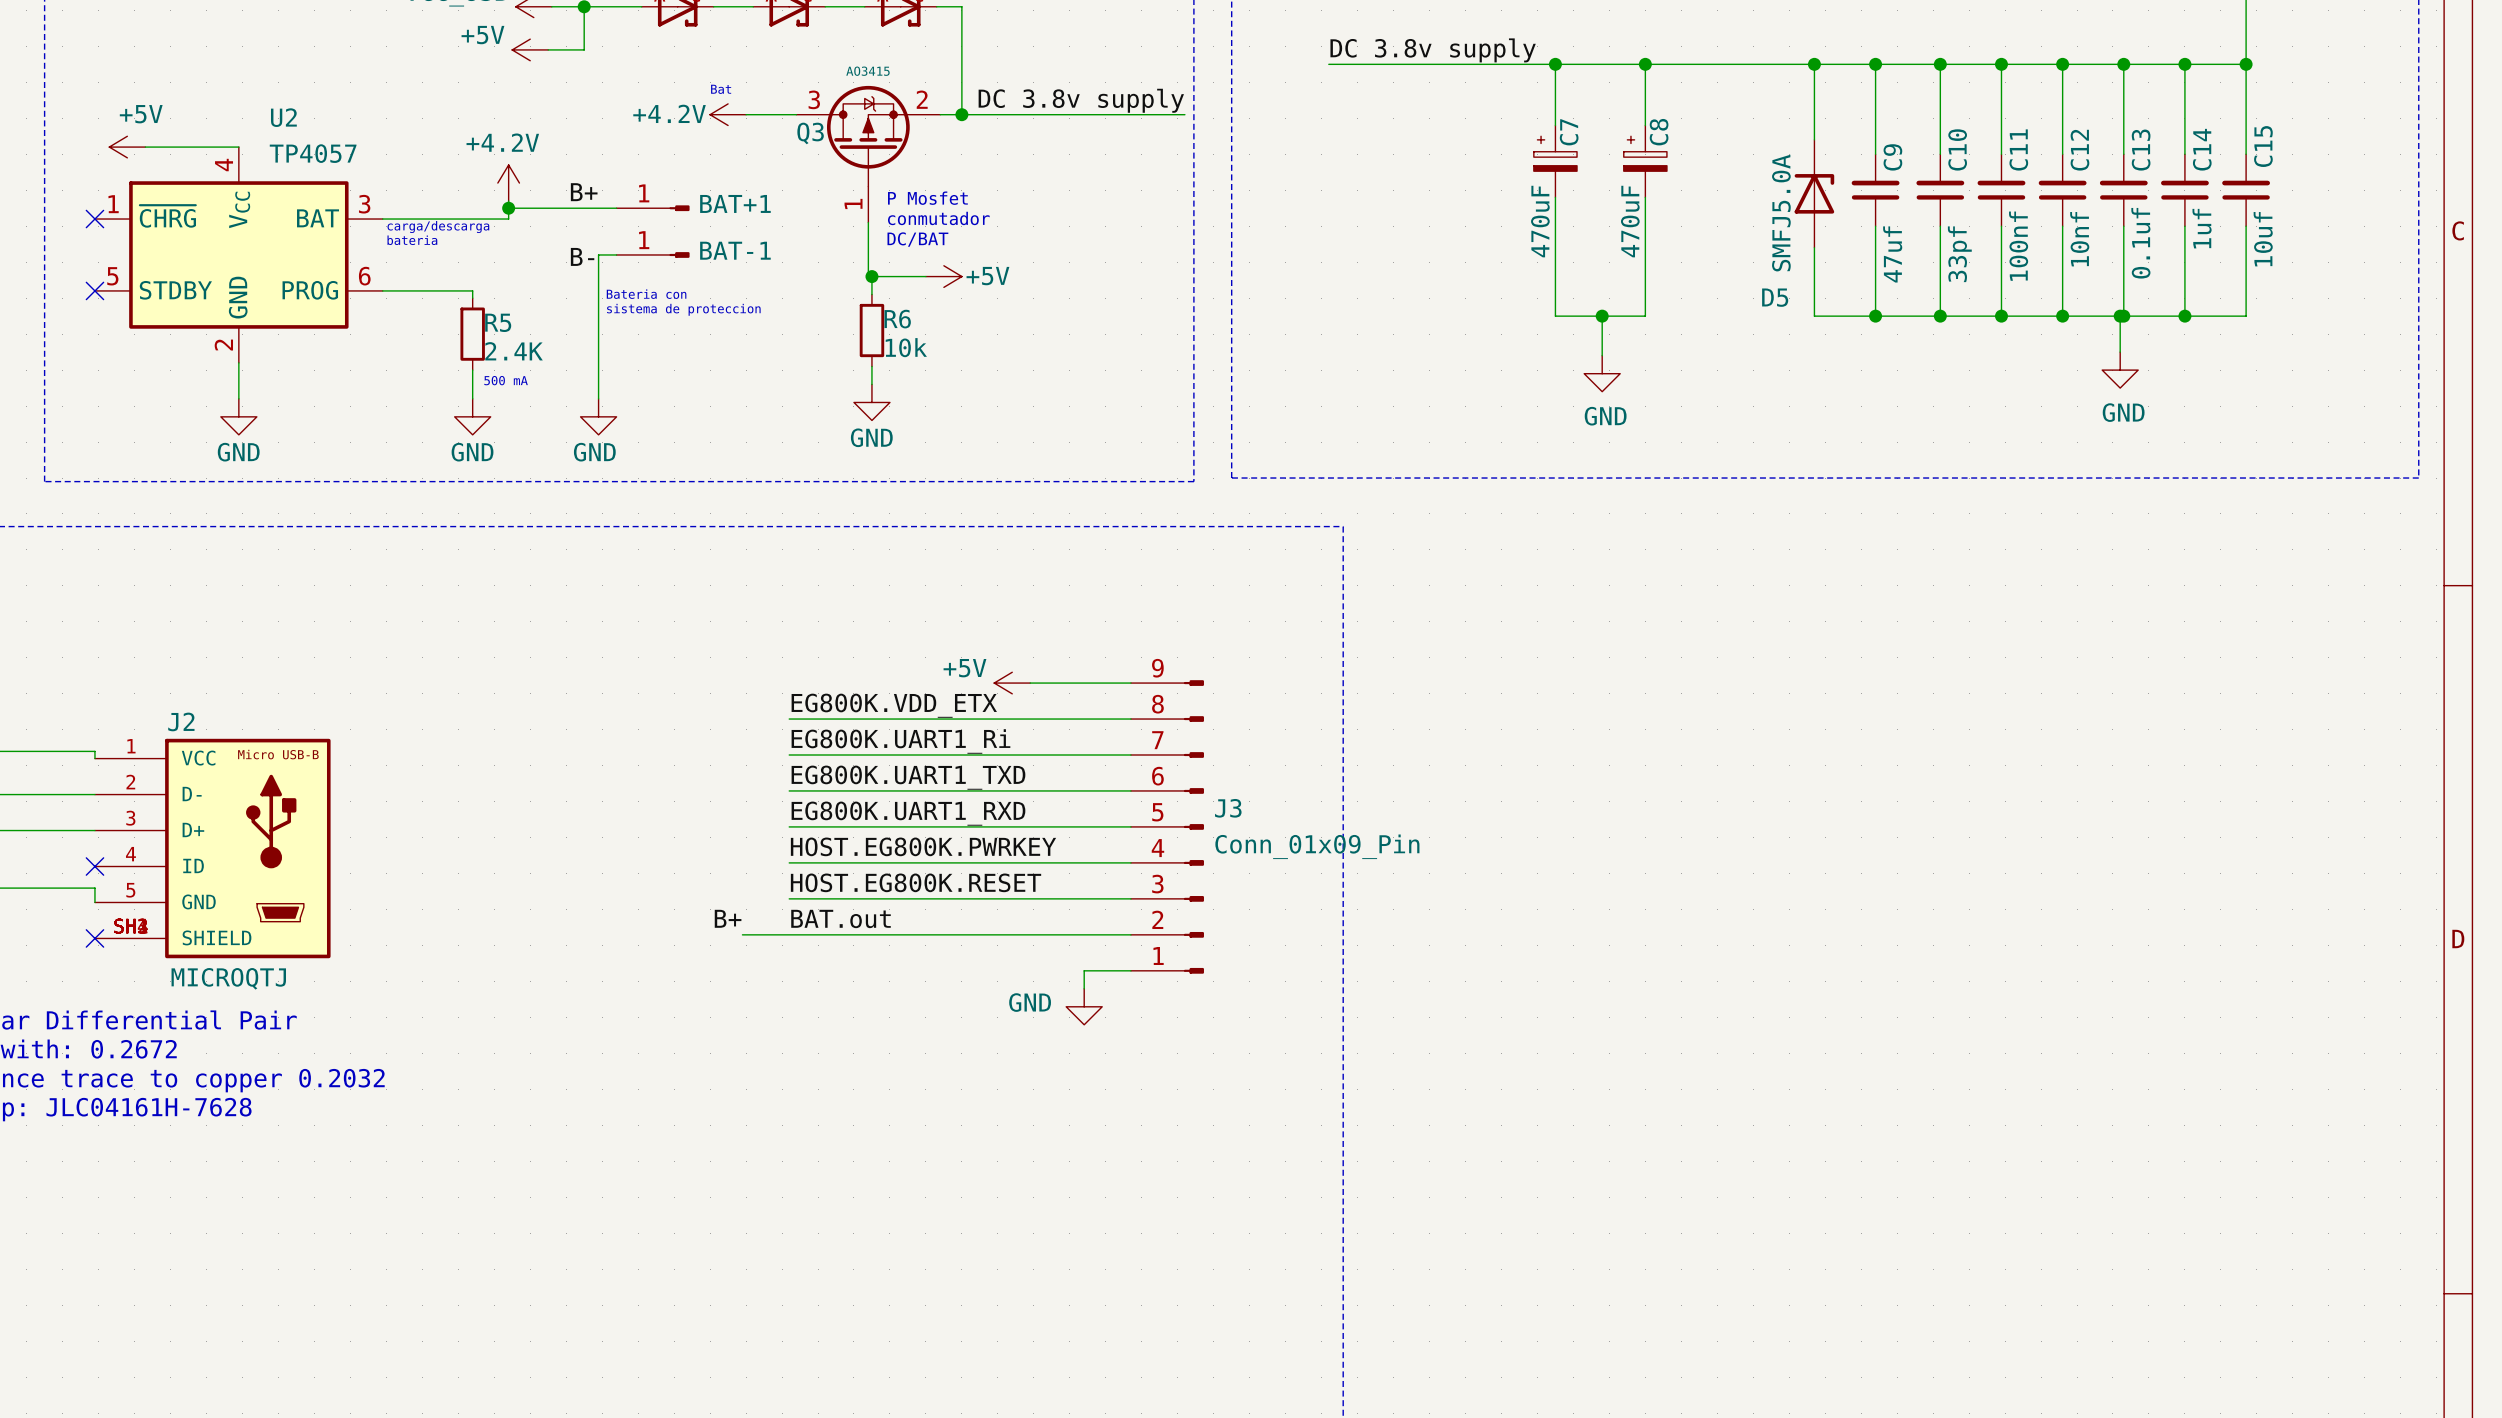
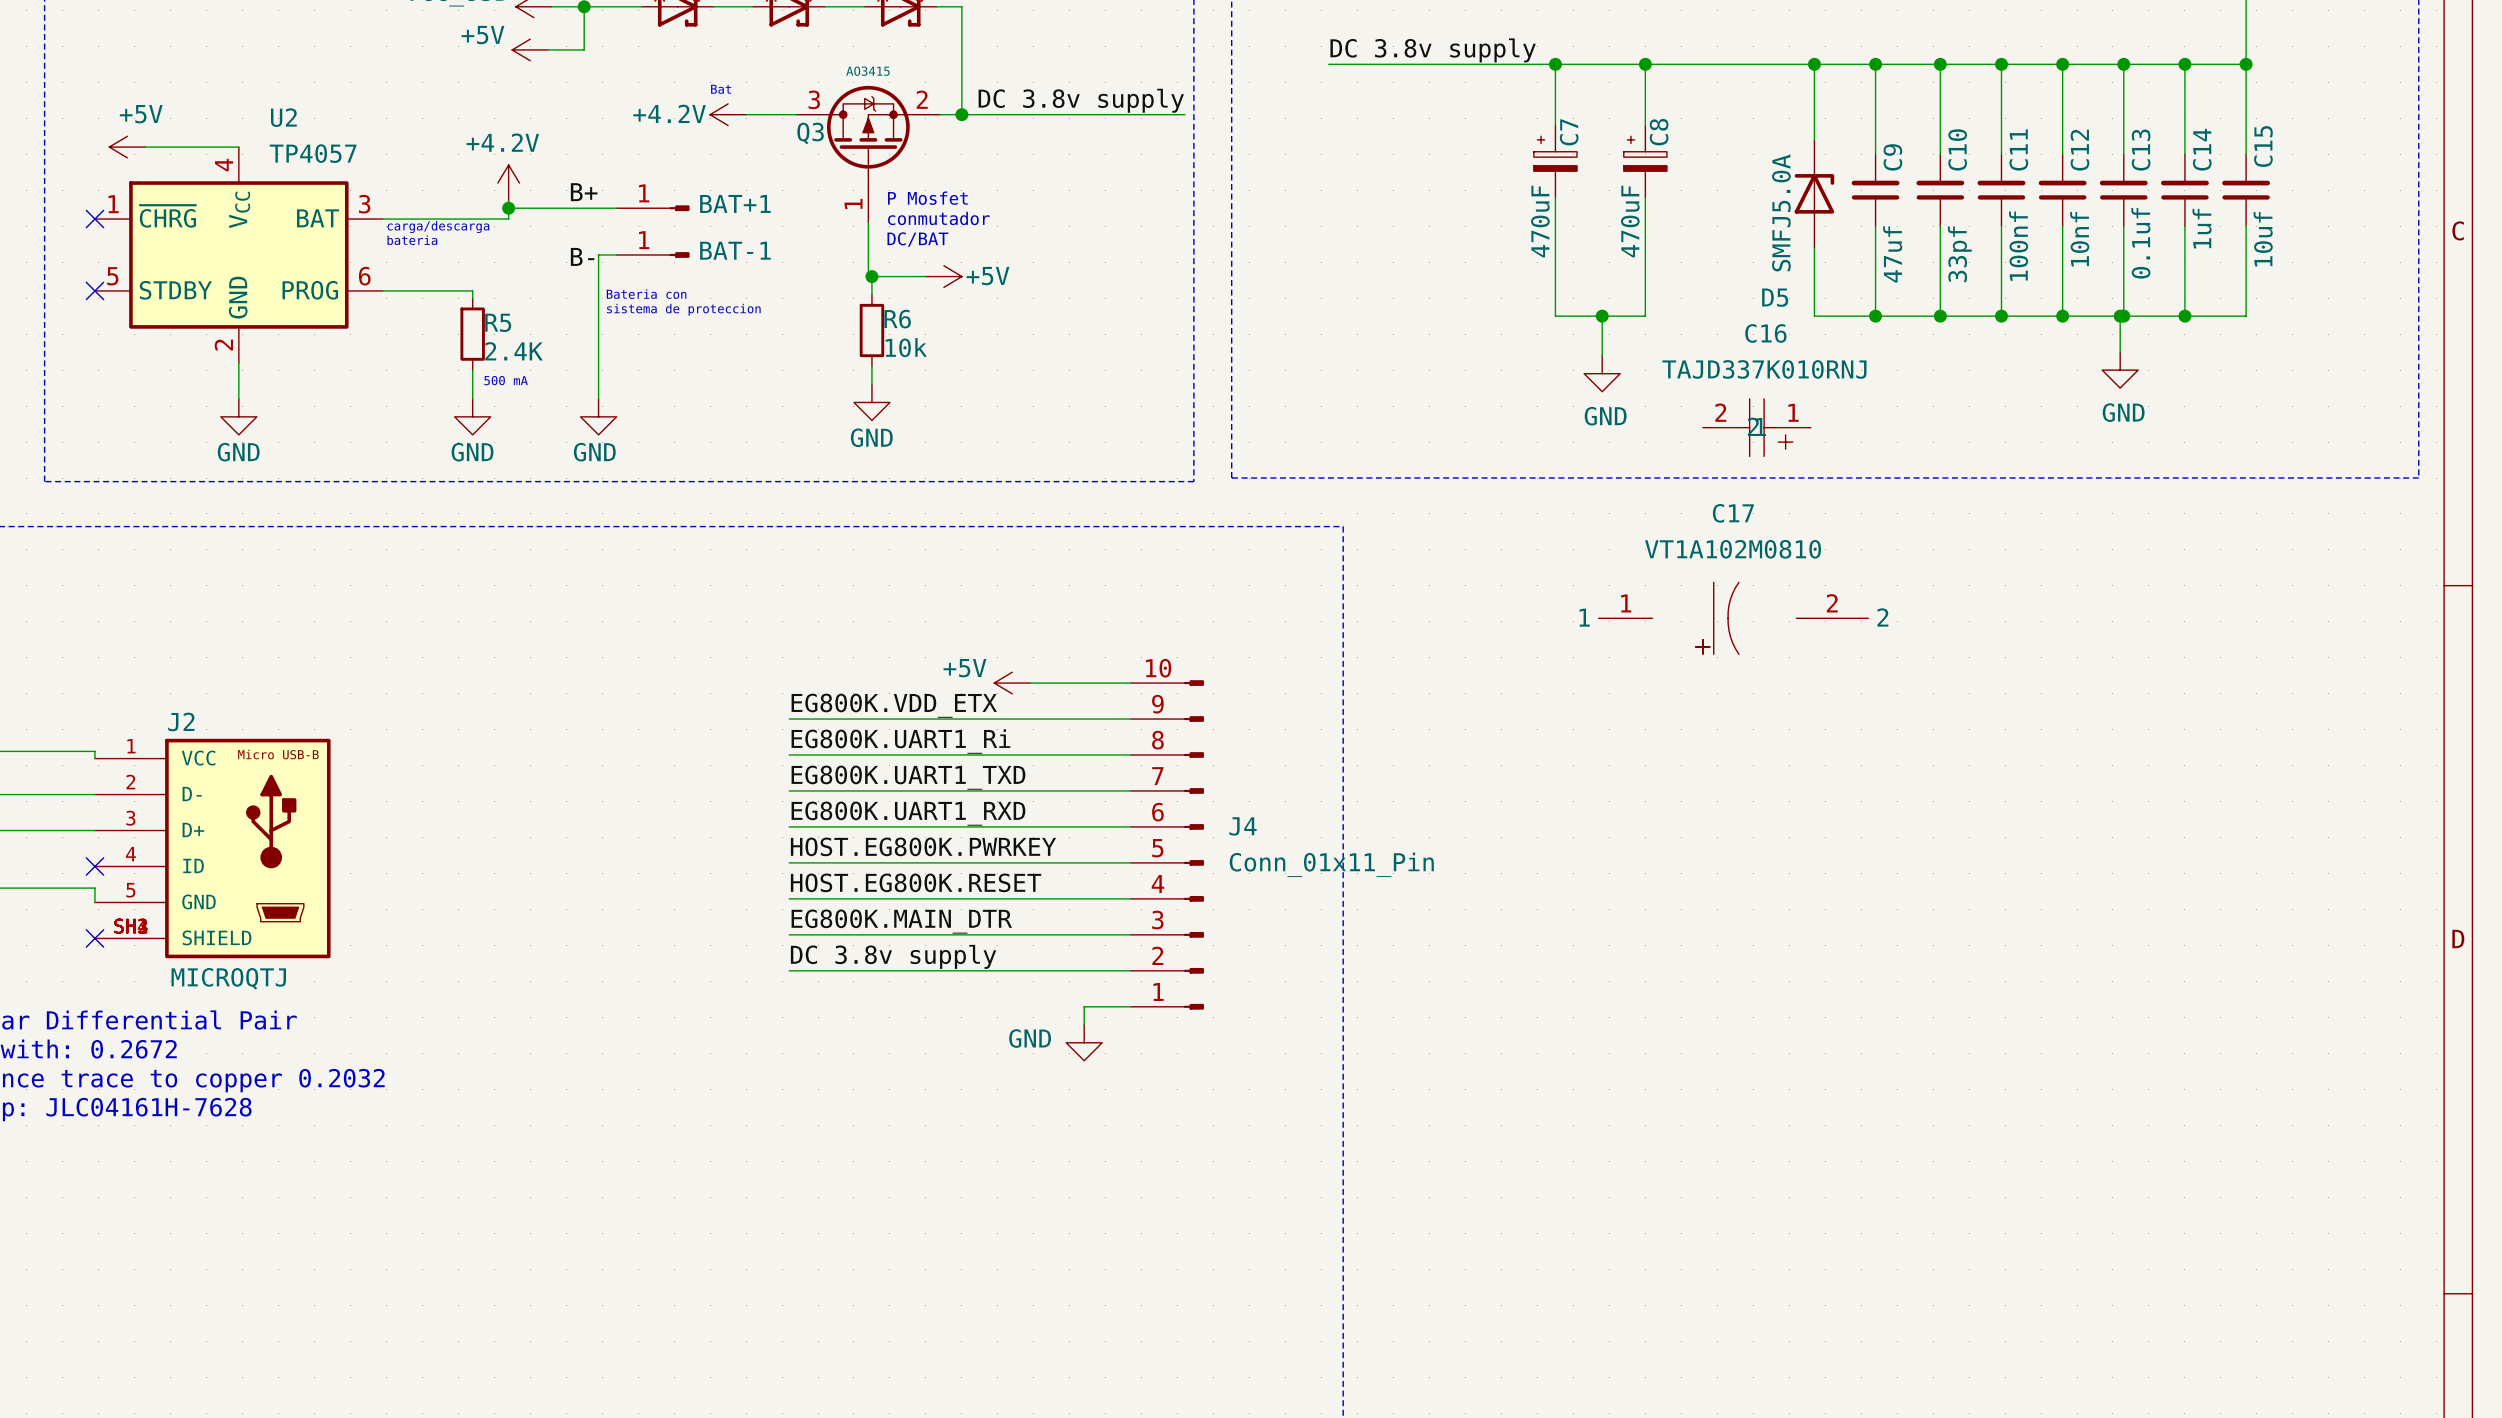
C16: none -> TAJD337K010RNJ (1756, 427)
C17: none -> VT1A102M0810 (1733, 618)
J3: Conn_01x09_Pin (1167, 826) -> none
J4: none -> Conn_01x11_Pin (1167, 844)
label: B+ (728, 918) -> none
label: BAT.out (841, 918) -> EG800K.MAIN_DTR (901, 921)
wire: (742, 934) (789, 934) -> none
label: none -> DC 3.8v supply (893, 956)
wire: (1084, 970) (1084, 988) -> (1084, 970) (789, 970)
power symbol position: GND (1084, 1006) -> GND (1084, 1042)
wire: none -> (1130, 1006) (1084, 1006) (1084, 1024)

